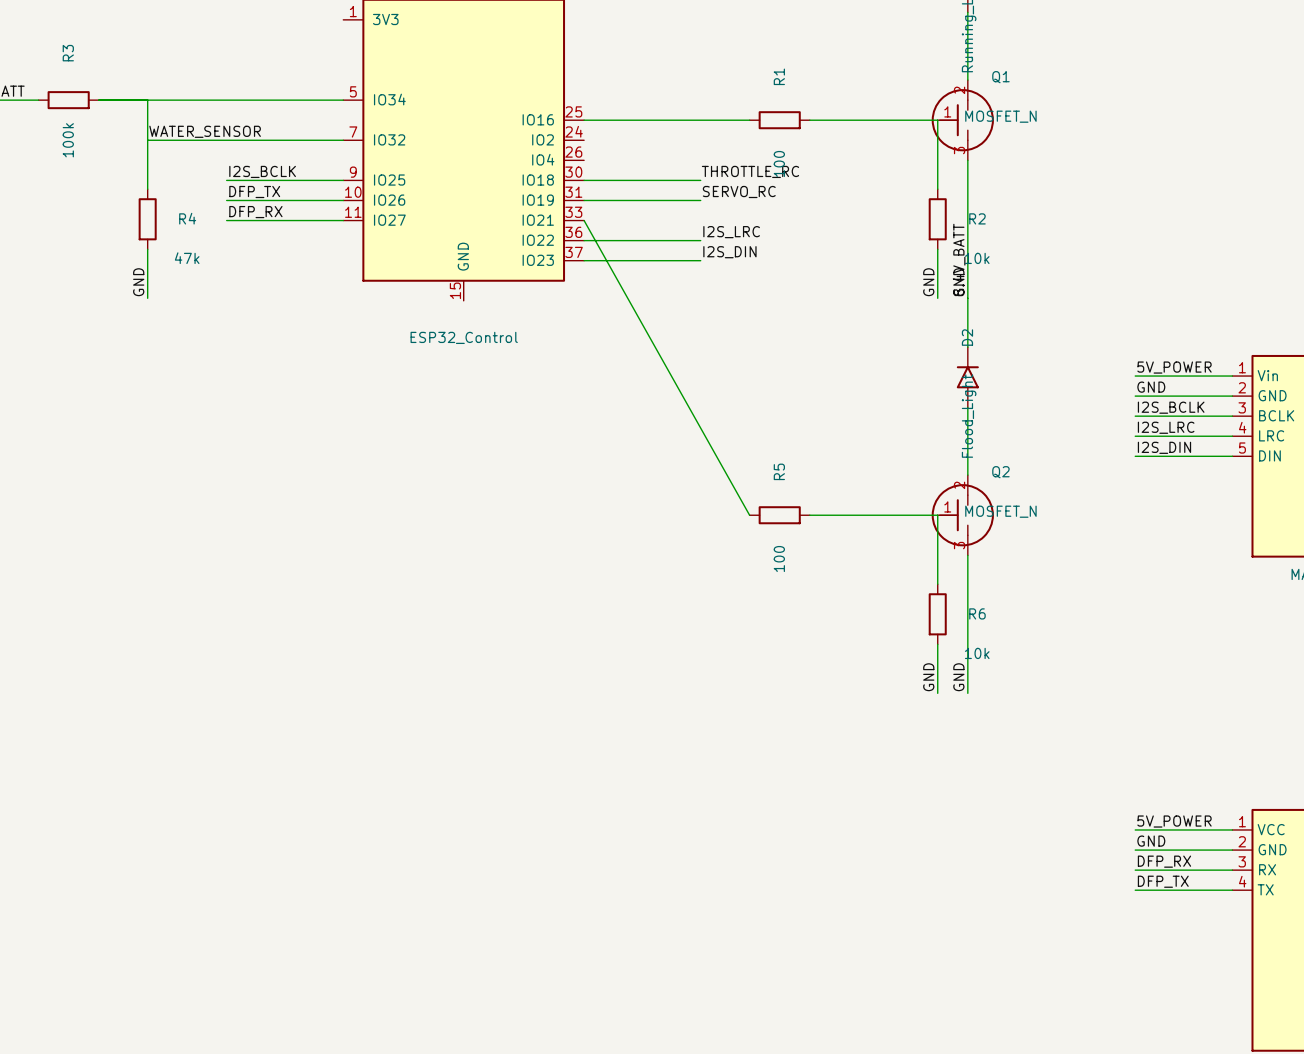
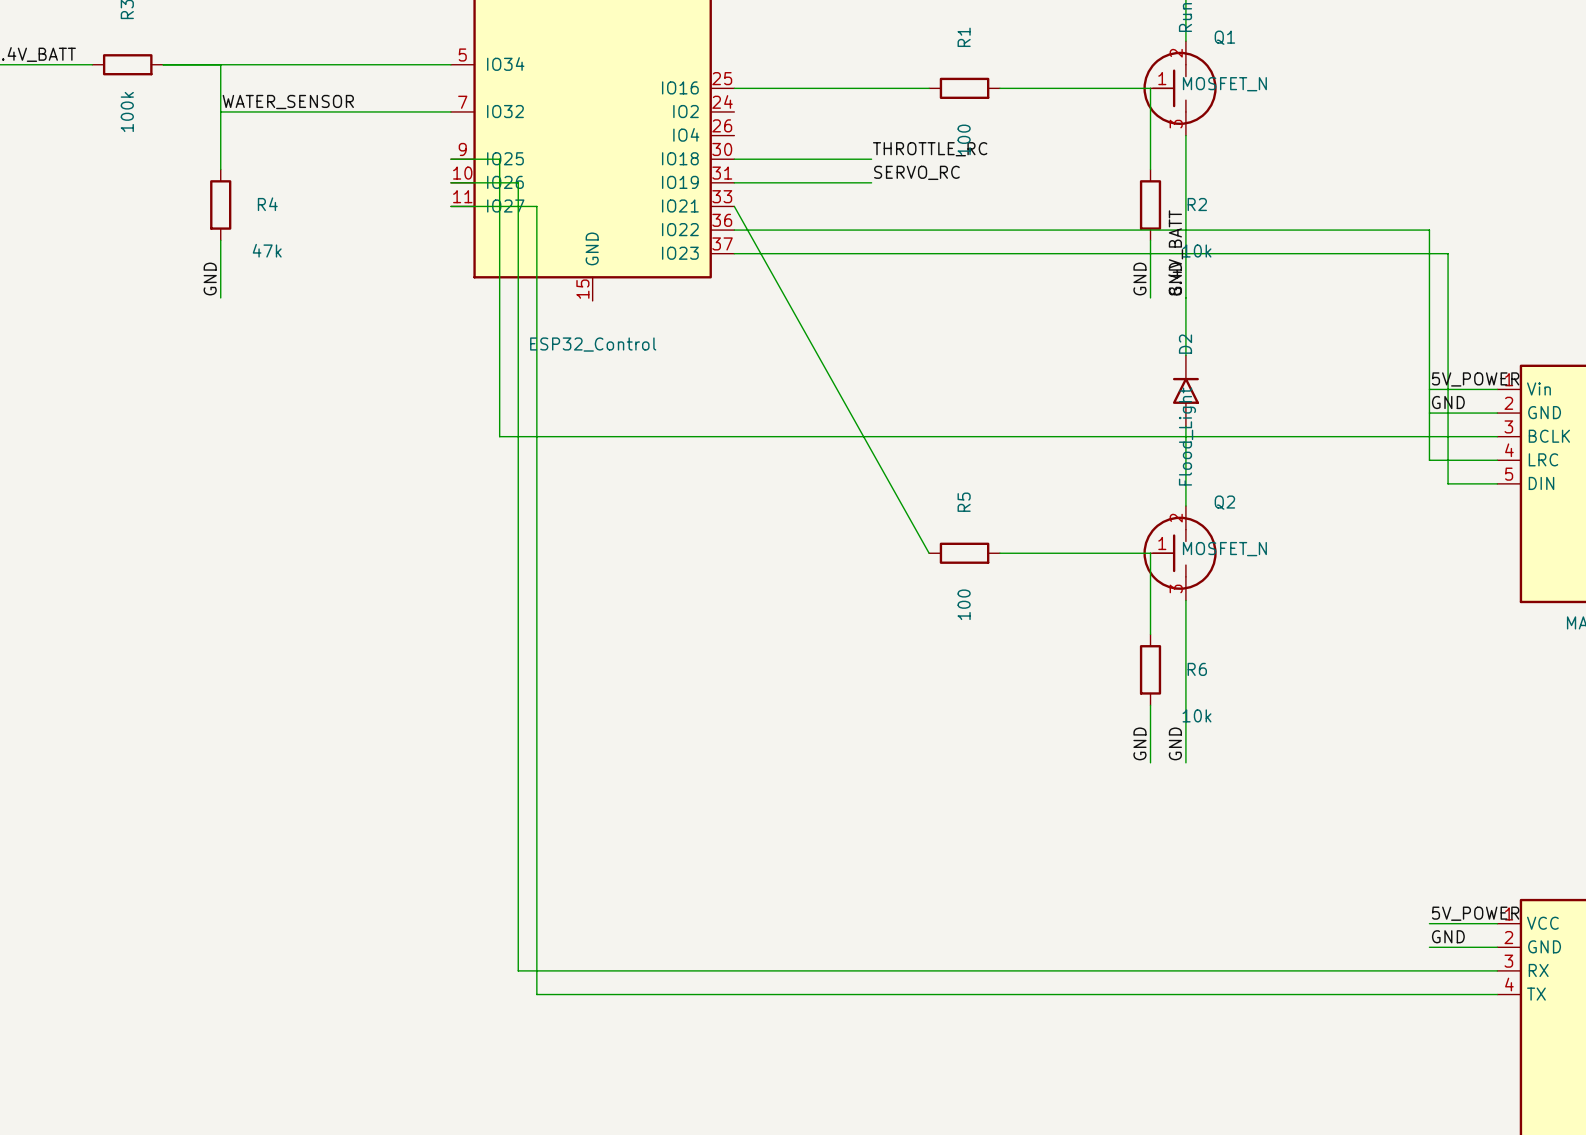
label: I2S_BCLK (262, 171) -> none
wire: (226, 180) (343, 180) -> (1382, 436) (499, 436) (499, 159) (450, 159)
label: DFP_TX (254, 192) -> none
wire: (226, 200) (343, 200) -> (1382, 970) (518, 970) (518, 182) (450, 182)
label: DFP_RX (255, 212) -> none
wire: (226, 220) (343, 220) -> (1382, 994) (536, 994) (536, 206) (450, 206)
label: I2S_LRC (731, 232) -> none
label: I2S_DIN (729, 252) -> none
label position: 5V_POWER (1174, 367) -> 5V_POWER (1475, 379)
wire: (1135, 376) (1174, 376) -> none
label position: GND (1151, 387) -> GND (1448, 402)
wire: (1135, 396) (1174, 396) -> none
label: I2S_BCLK (1171, 407) -> none
label: I2S_LRC (1166, 427) -> none
wire: (1135, 436) (1174, 436) -> (871, 230) (1429, 230) (1429, 460)
label: I2S_DIN (1164, 447) -> none
wire: (1135, 456) (1190, 456) -> (871, 253) (1448, 253) (1448, 483)
label position: 5V_POWER (1174, 821) -> 5V_POWER (1475, 913)
wire: (1135, 829) (1174, 829) -> none
label position: GND (1151, 841) -> GND (1448, 936)
wire: (1135, 850) (1174, 850) -> none
label: DFP_RX (1164, 861) -> none
label: DFP_TX (1163, 881) -> none

